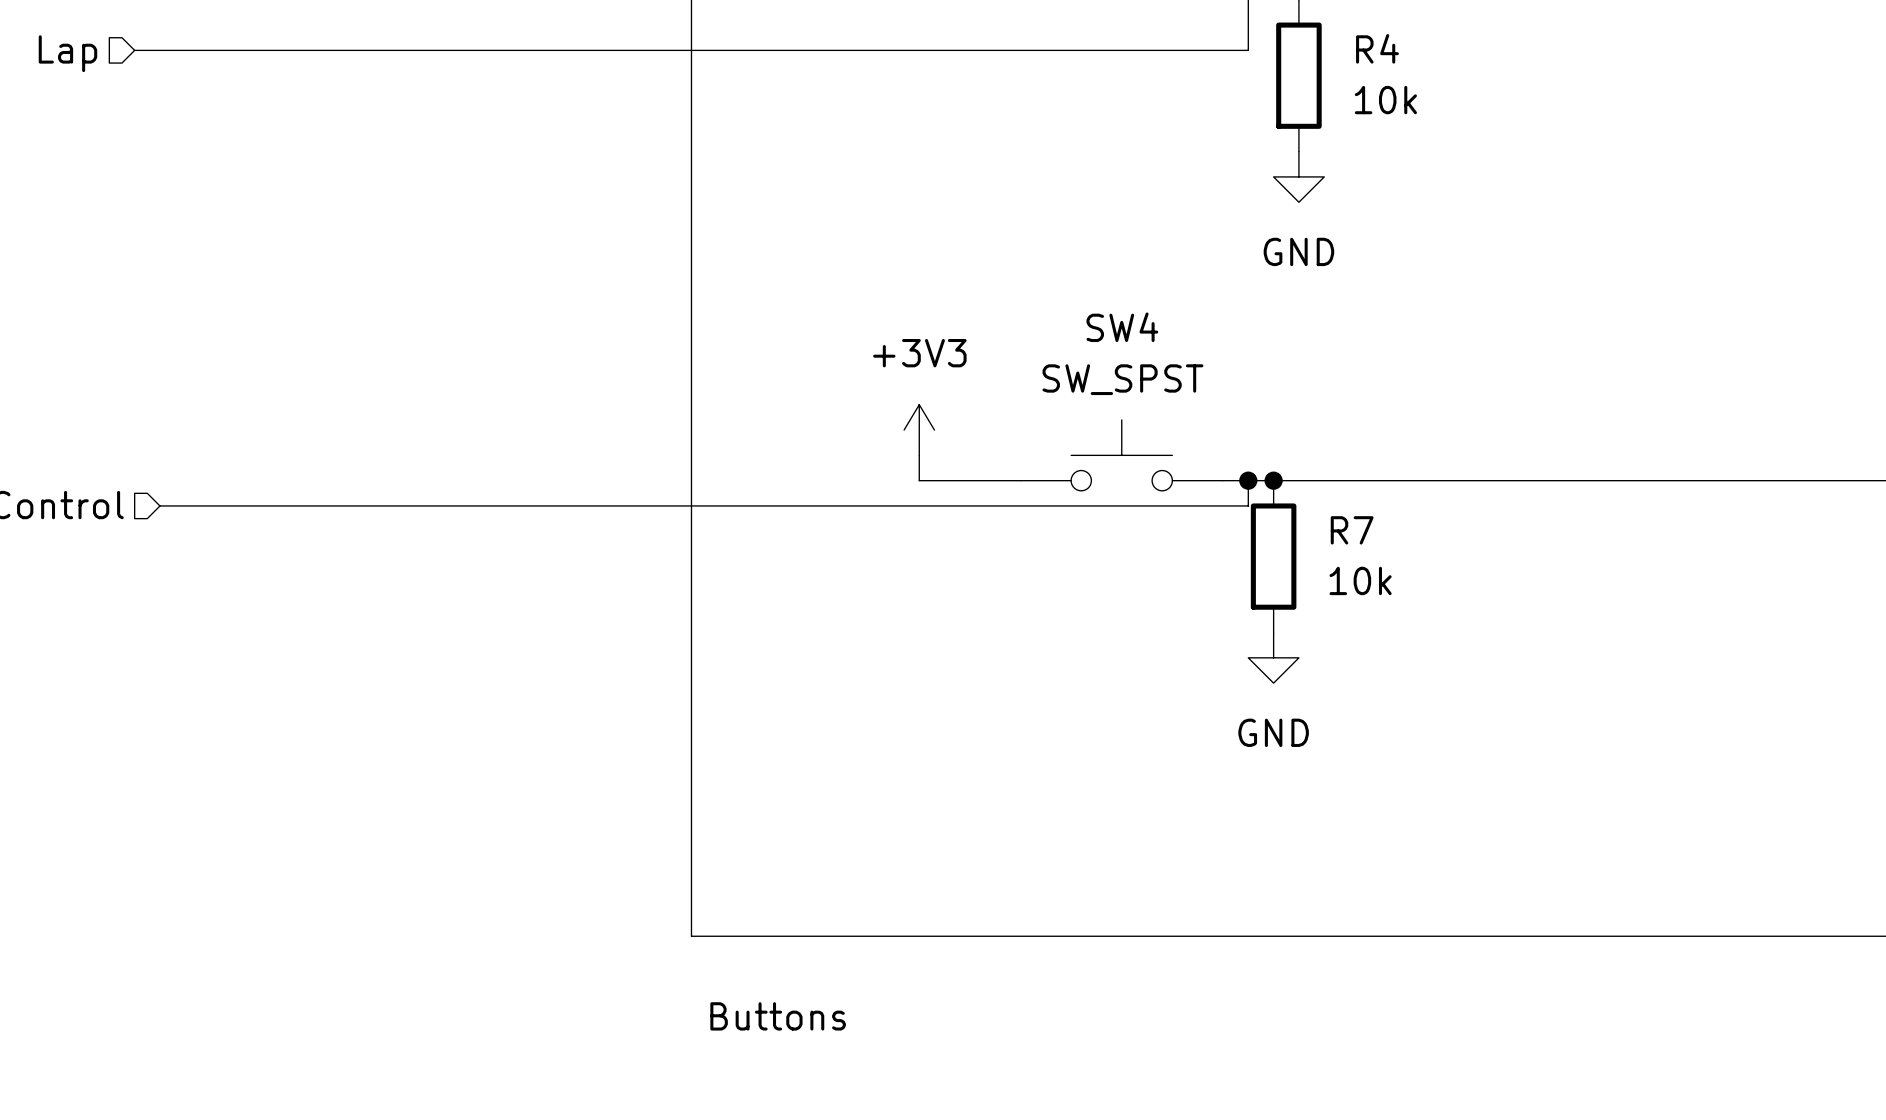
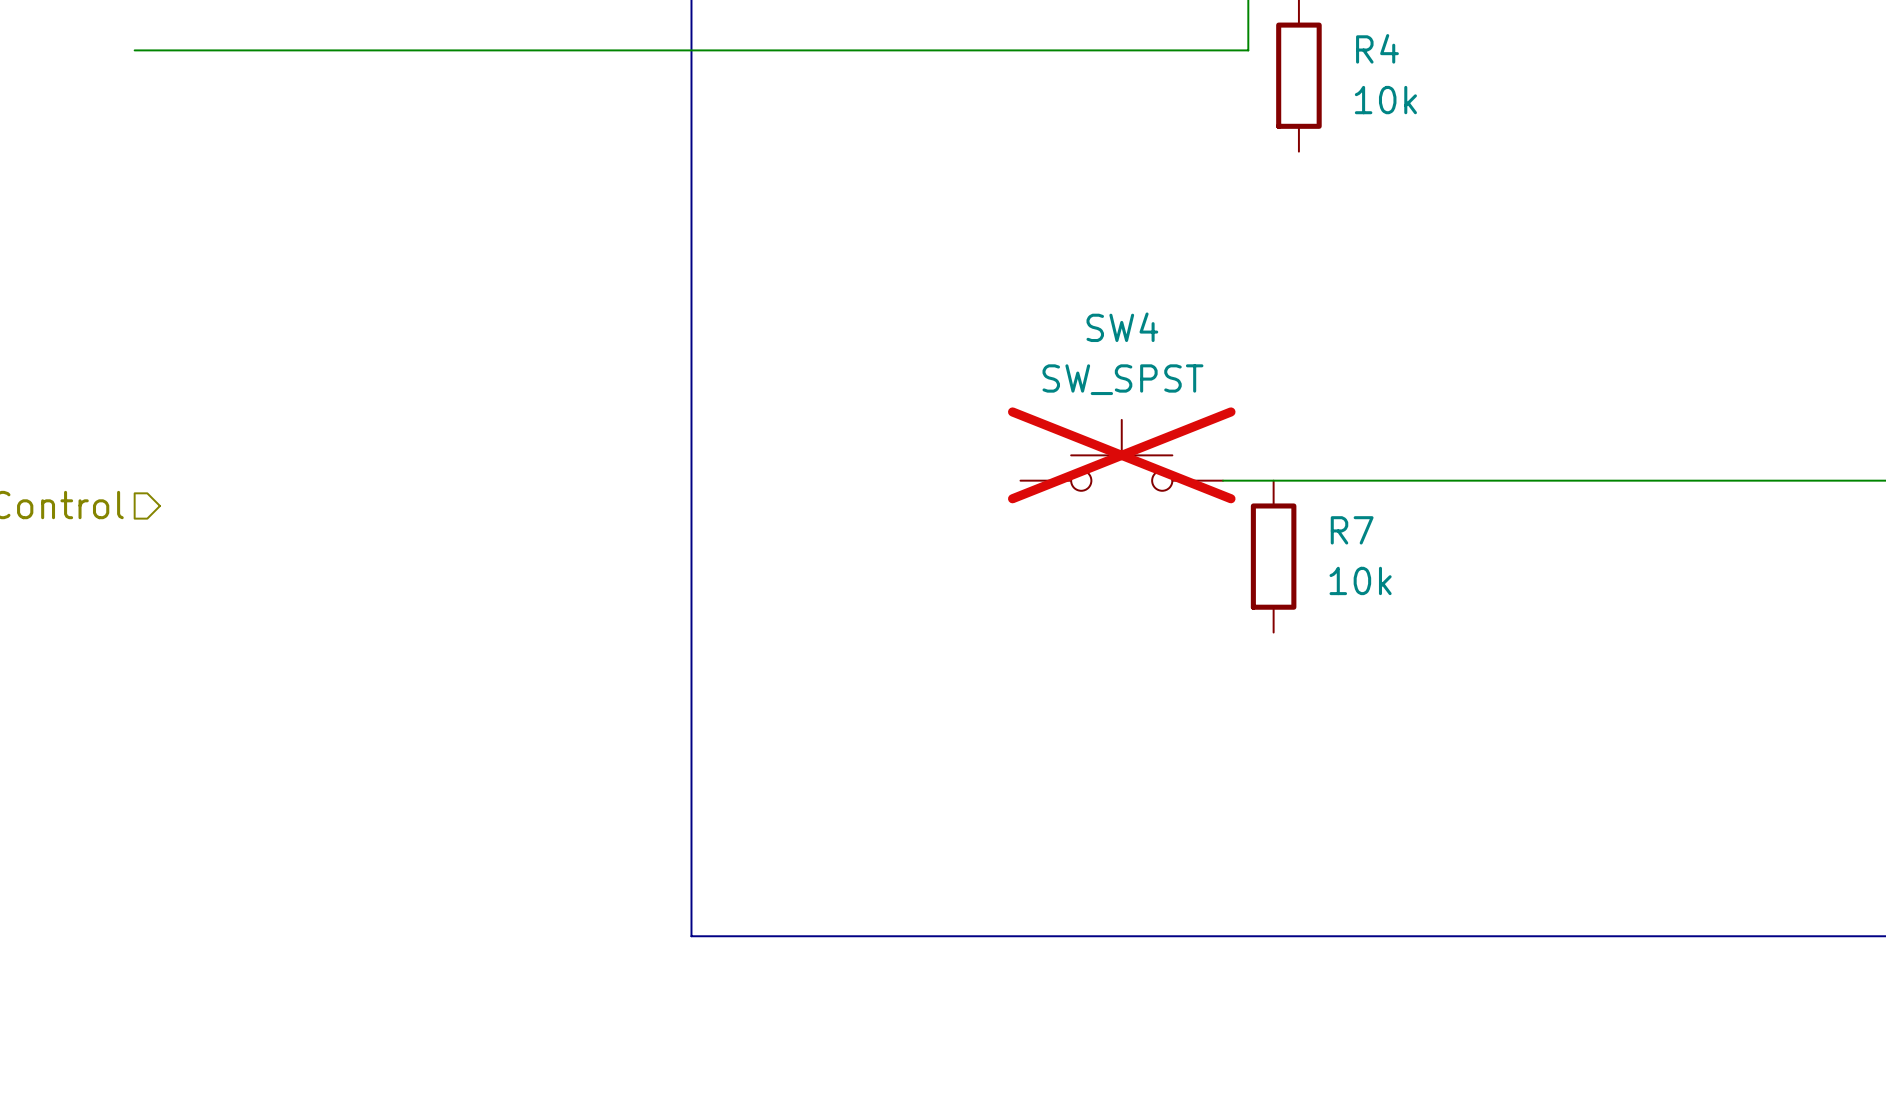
hierarchical label: Lap (67, 53) -> none
power symbol: GND (1298, 176) -> none
power symbol: +3V3 (919, 430) -> none
wire: (919, 455) (919, 480) (1020, 480) -> none
SW4 do-not-place cross: none -> (1121, 455)
wire: (1248, 480) (1248, 505) (159, 505) -> none
junction: (1248, 480) -> none
junction: (1273, 480) -> none
power symbol: GND (1273, 657) -> none
text: Buttons (778, 1016) -> none

